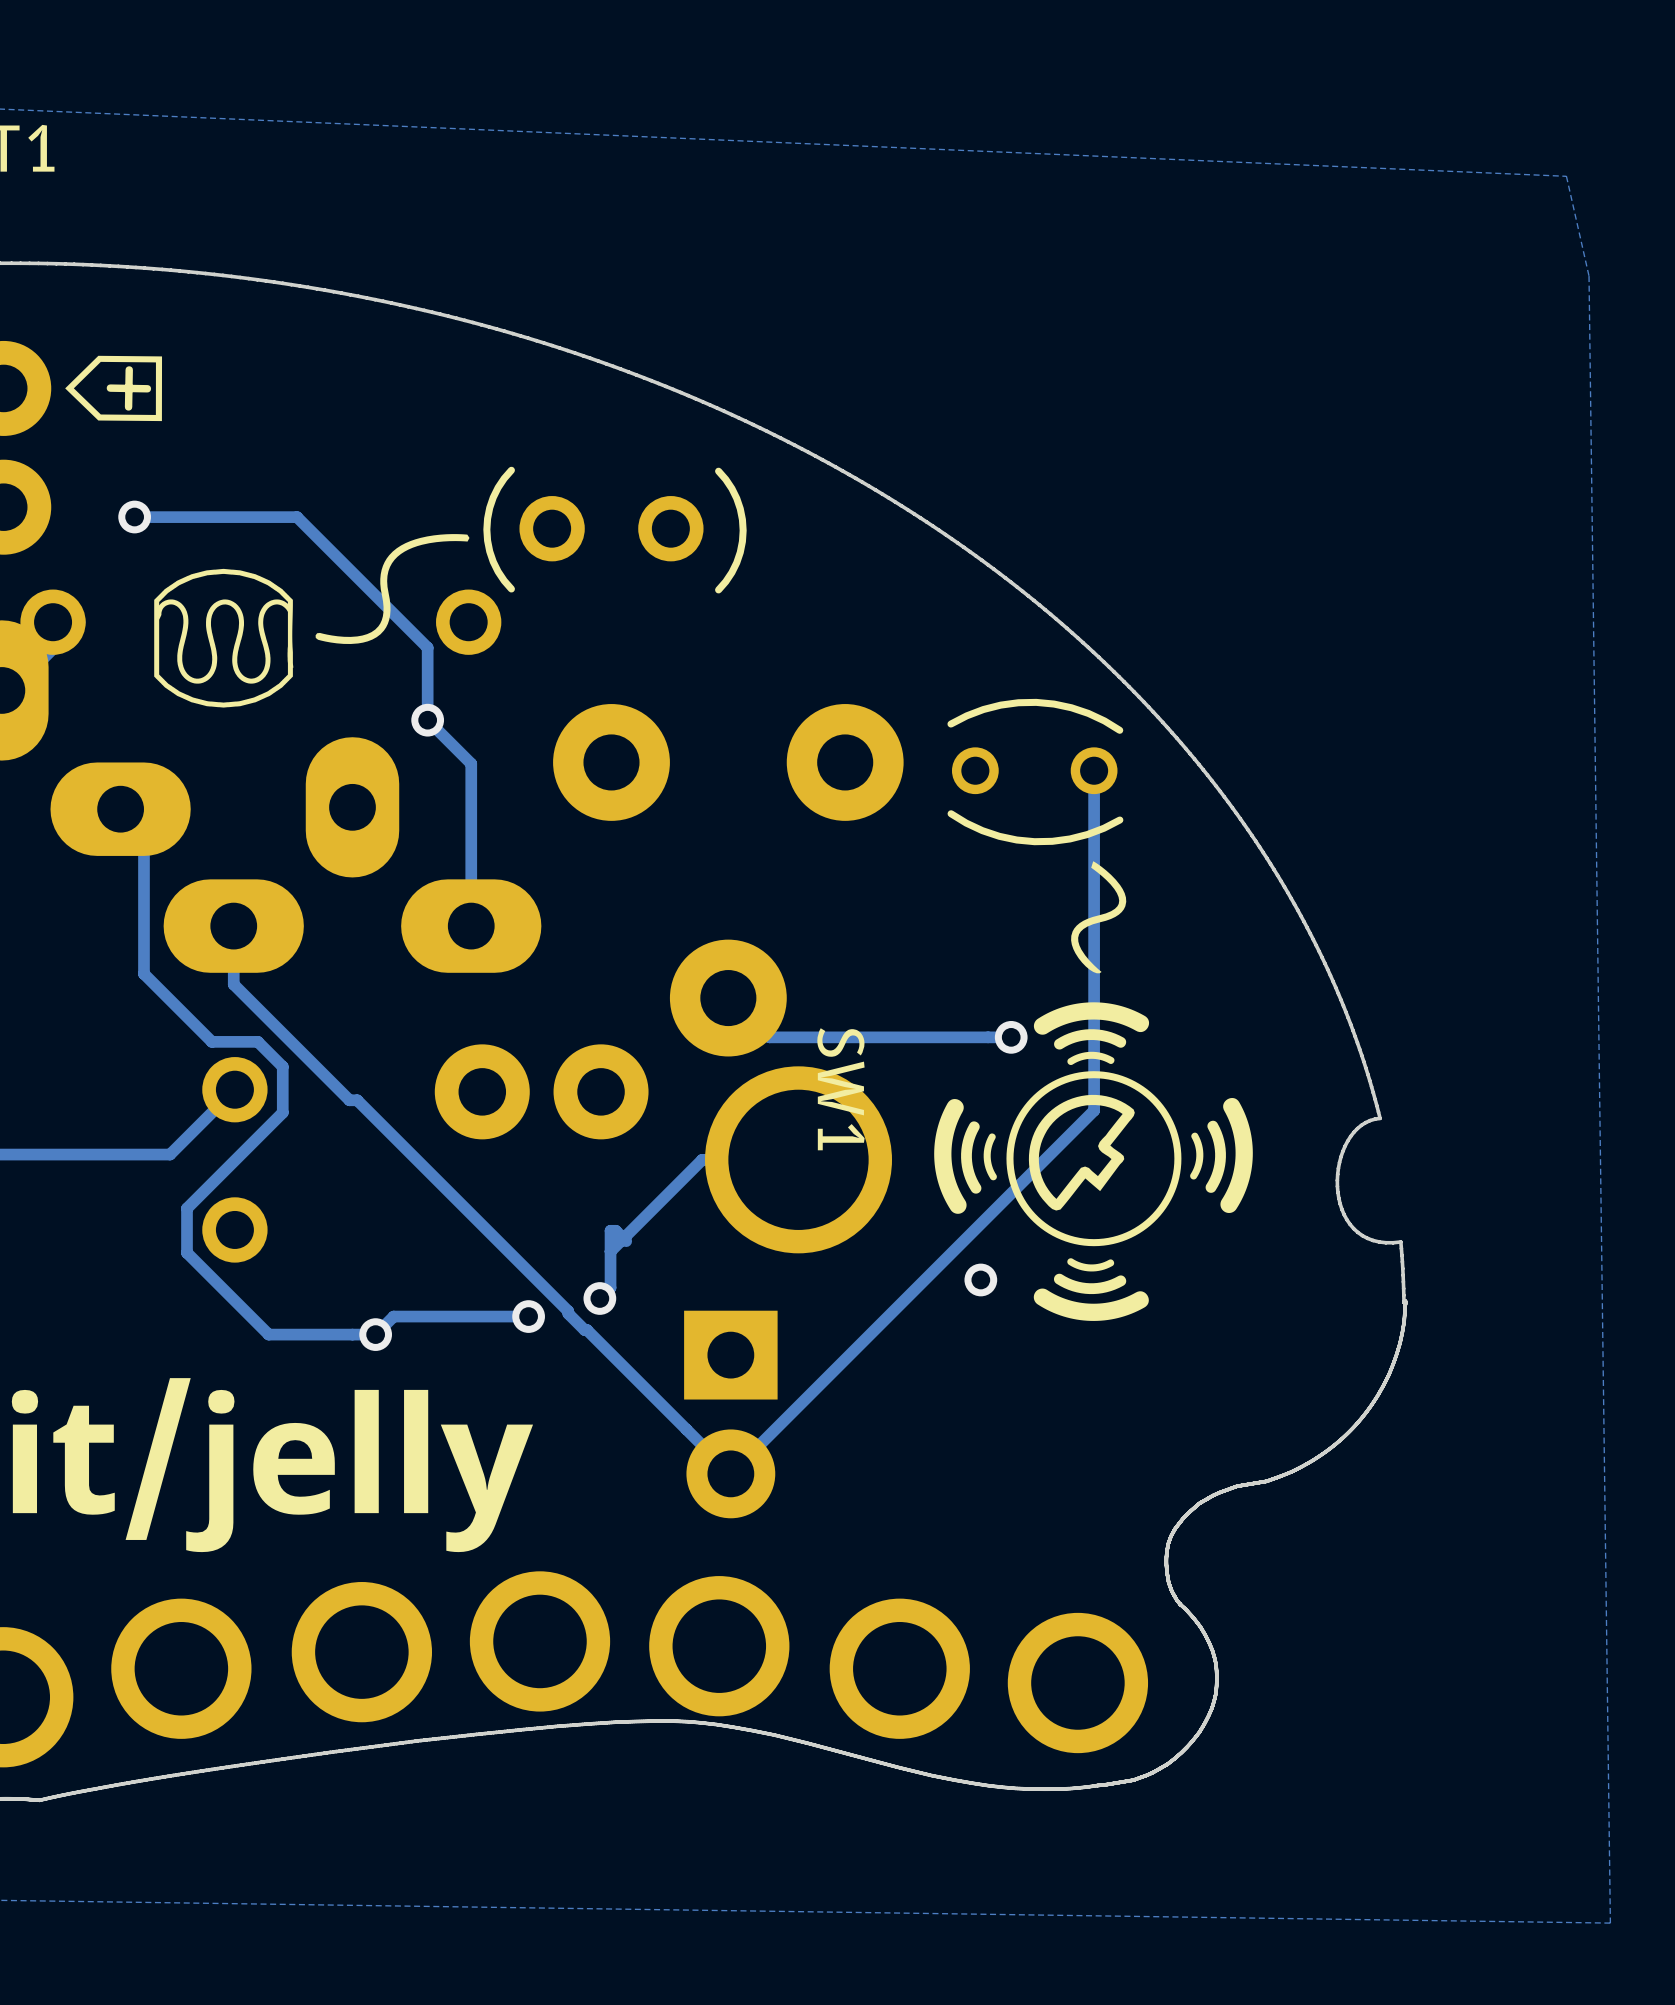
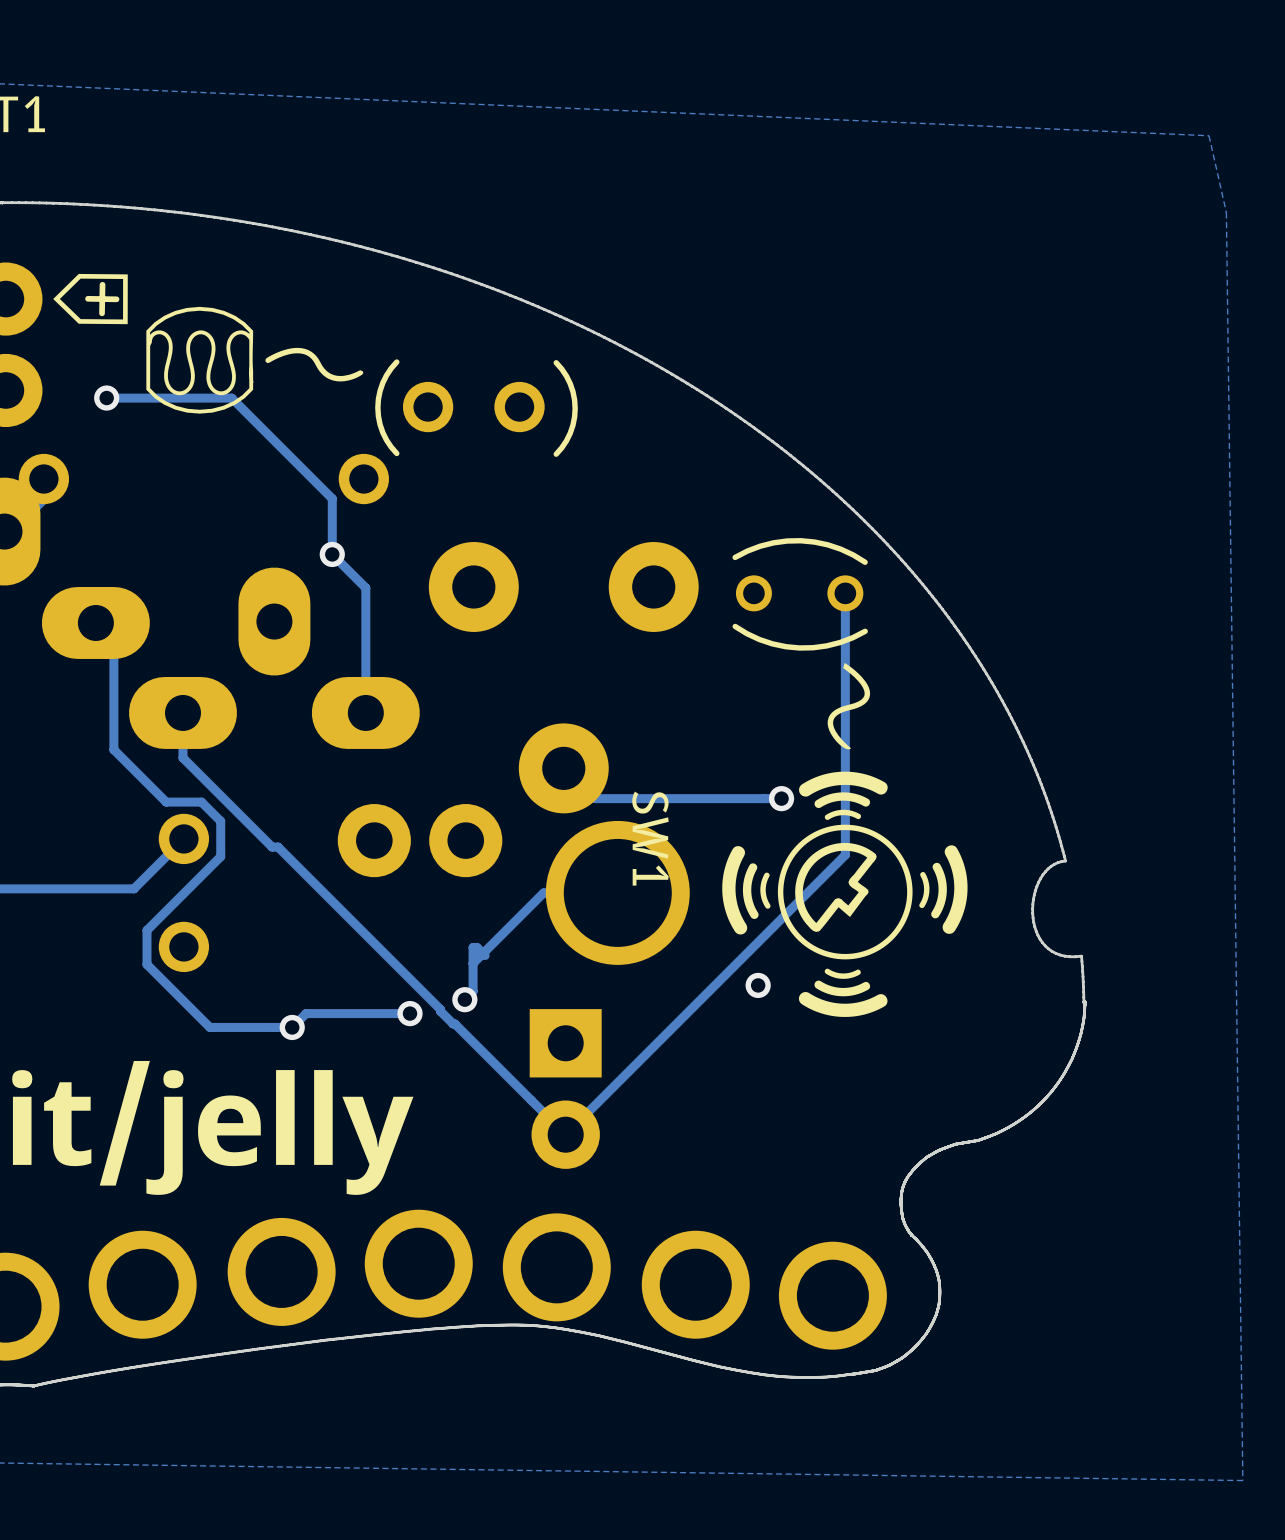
drawing: none -> [146, 306, 364, 414]
drawing: [154, 534, 470, 708] -> none

